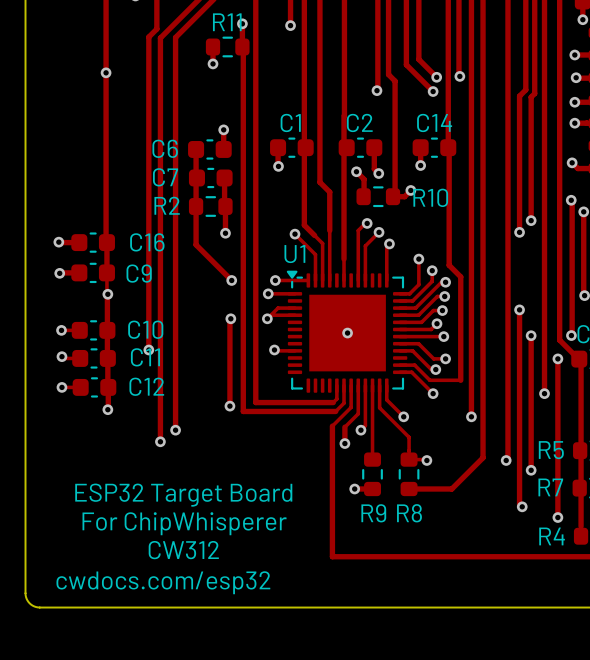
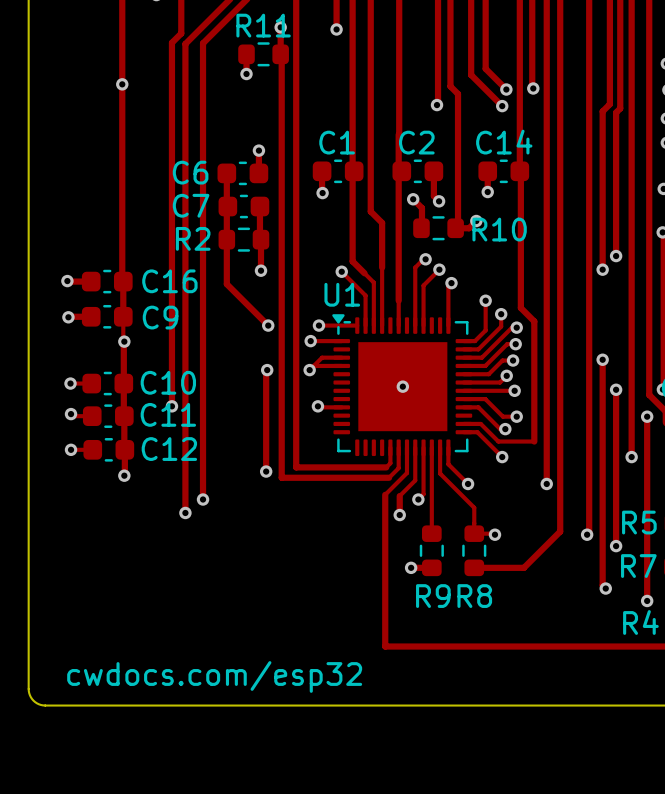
text: ESP32 Target Board (183, 495) -> none
text: For ChipWhisperer (184, 523) -> none
text: CW312 (183, 550) -> none

